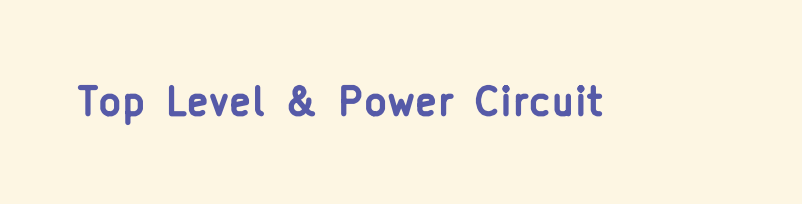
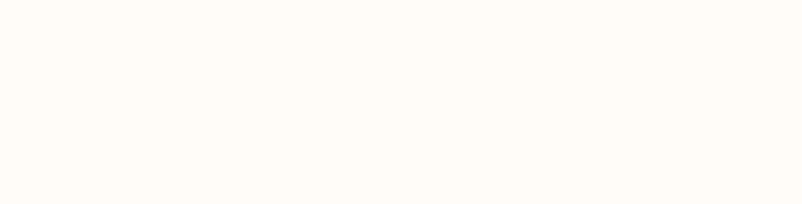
text: Top Level & Power Circuit (340, 105) -> none

